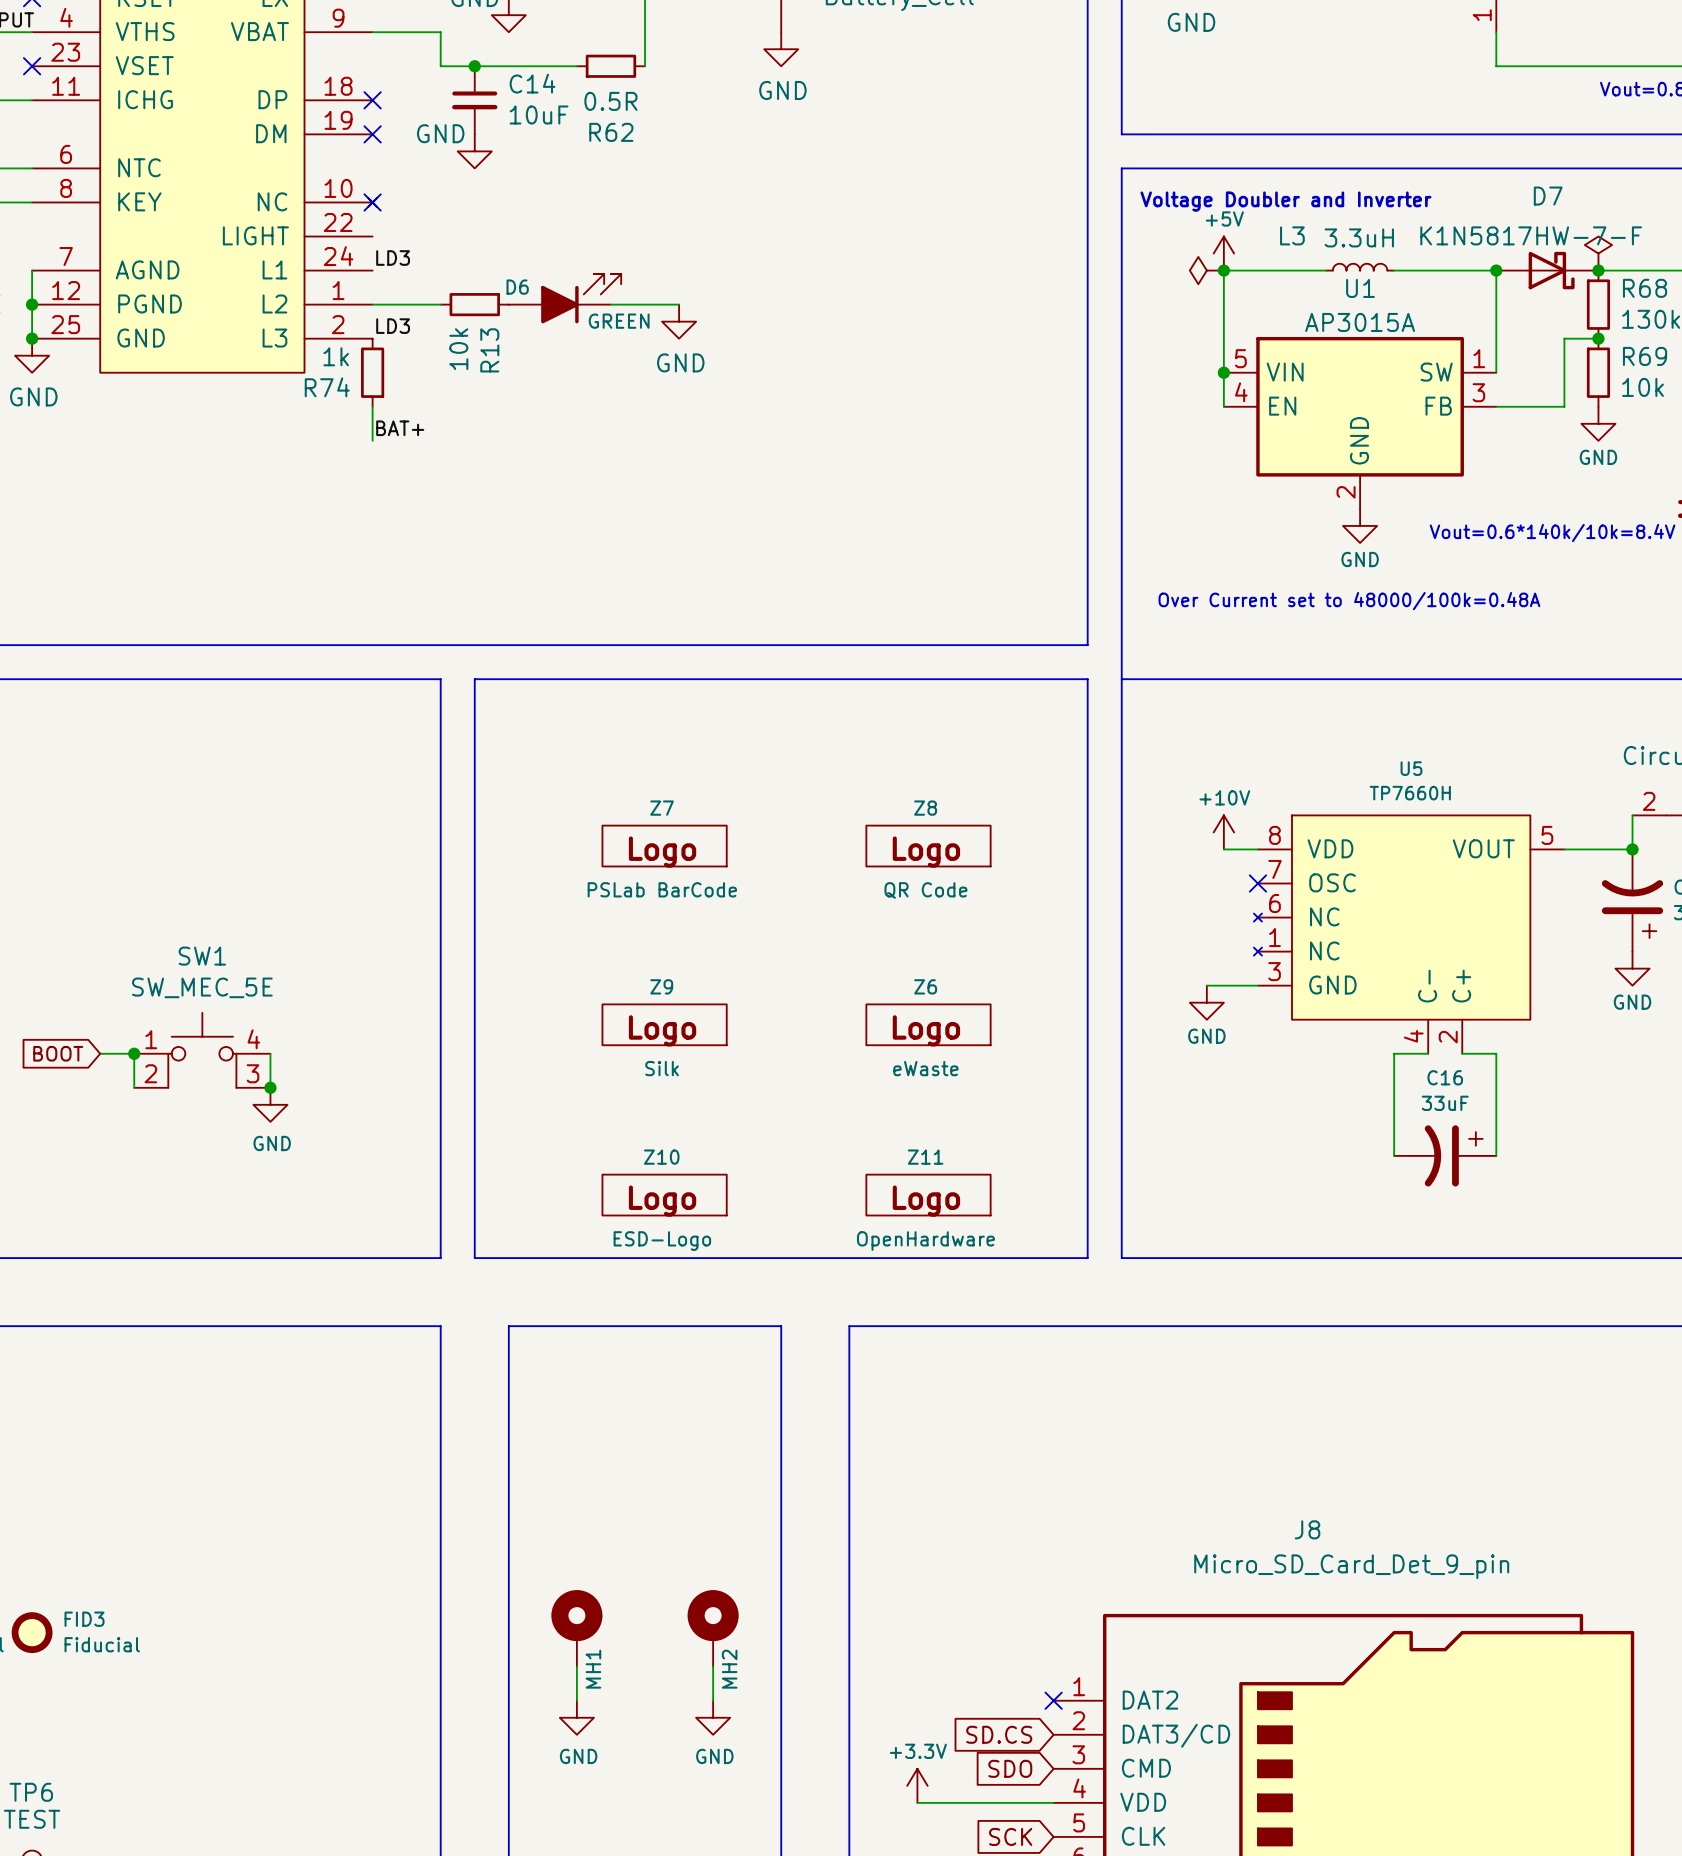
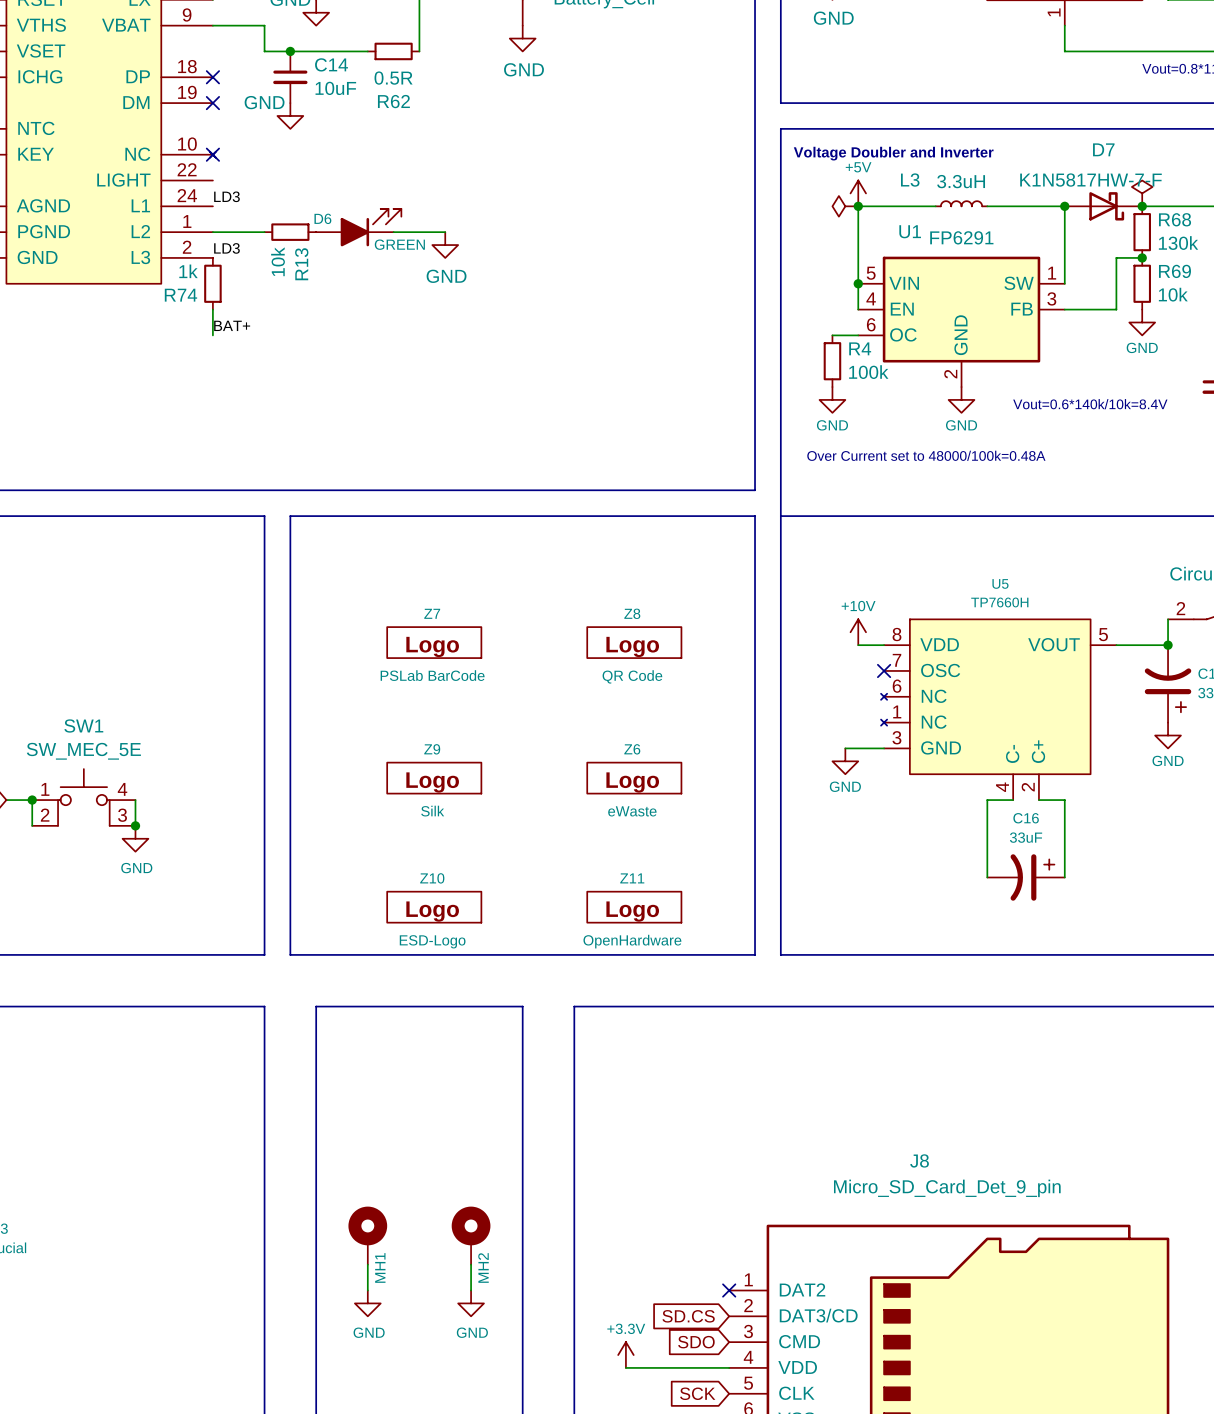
U1 name position: U1 (1360, 288) -> U1 (910, 231)
U1 value: AP3015A (1360, 322) -> FP6291 (961, 237)
U1 symbol: [1223, 336, 1497, 509] -> [858, 256, 1065, 388]
wire: none -> (832, 335) (858, 335)
R4: none -> 100k (832, 361)
power symbol: none -> GND (832, 399)

